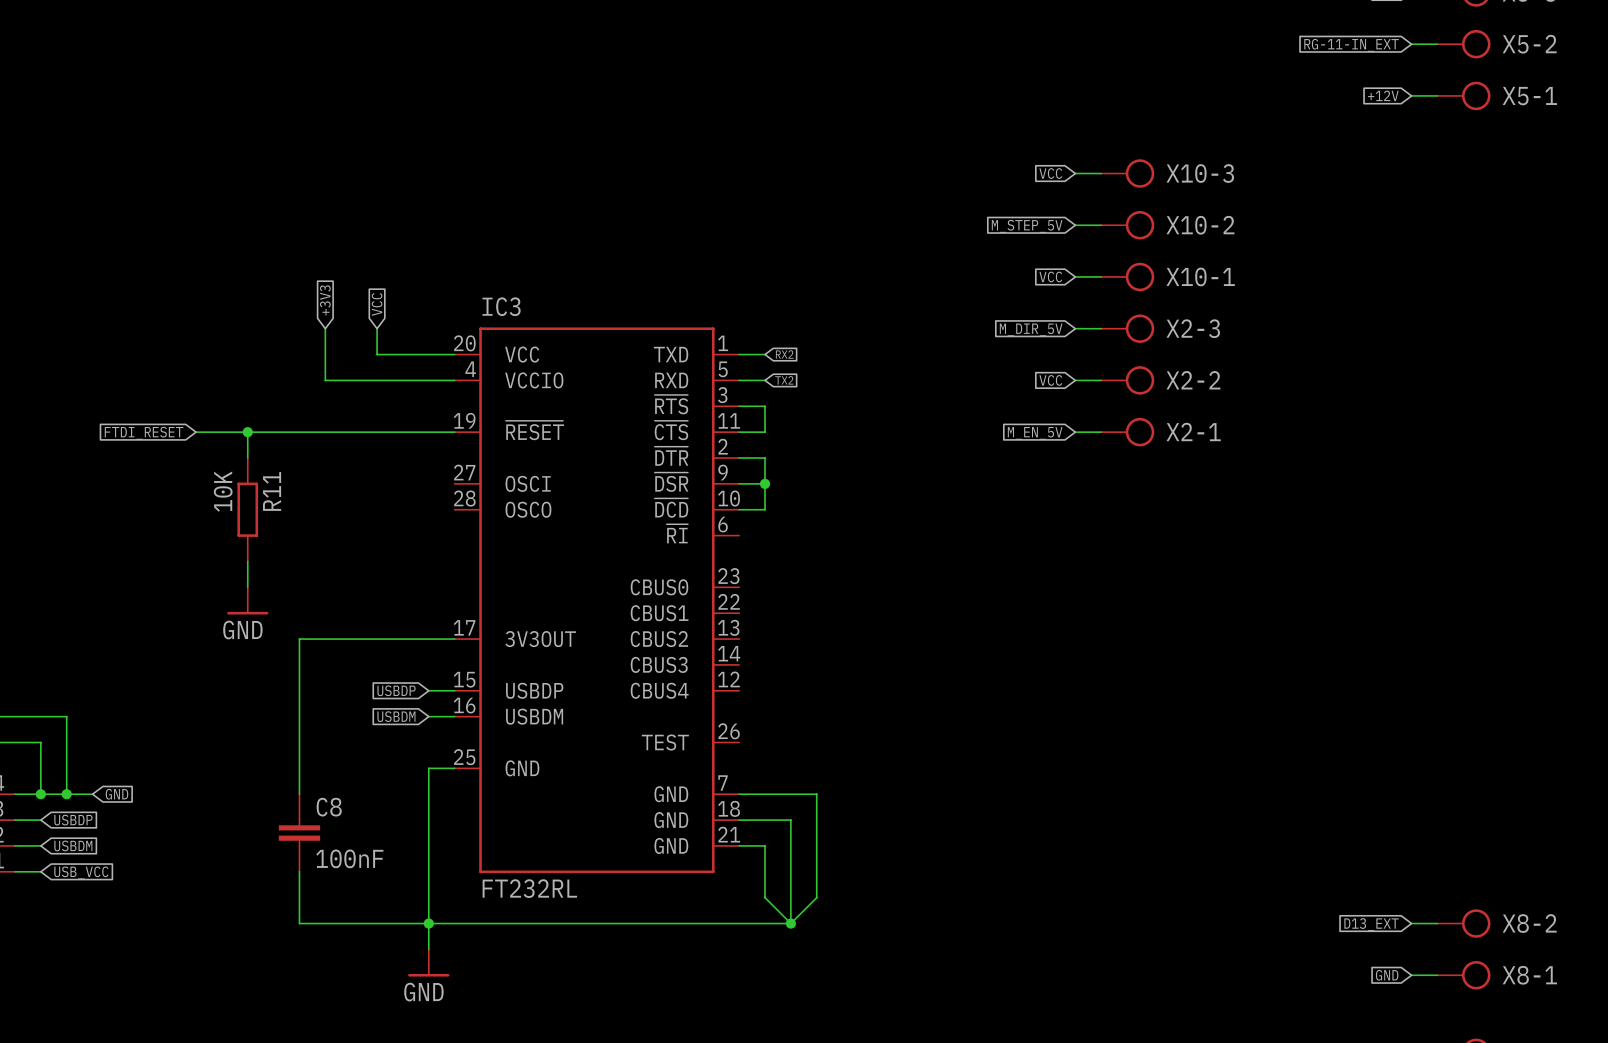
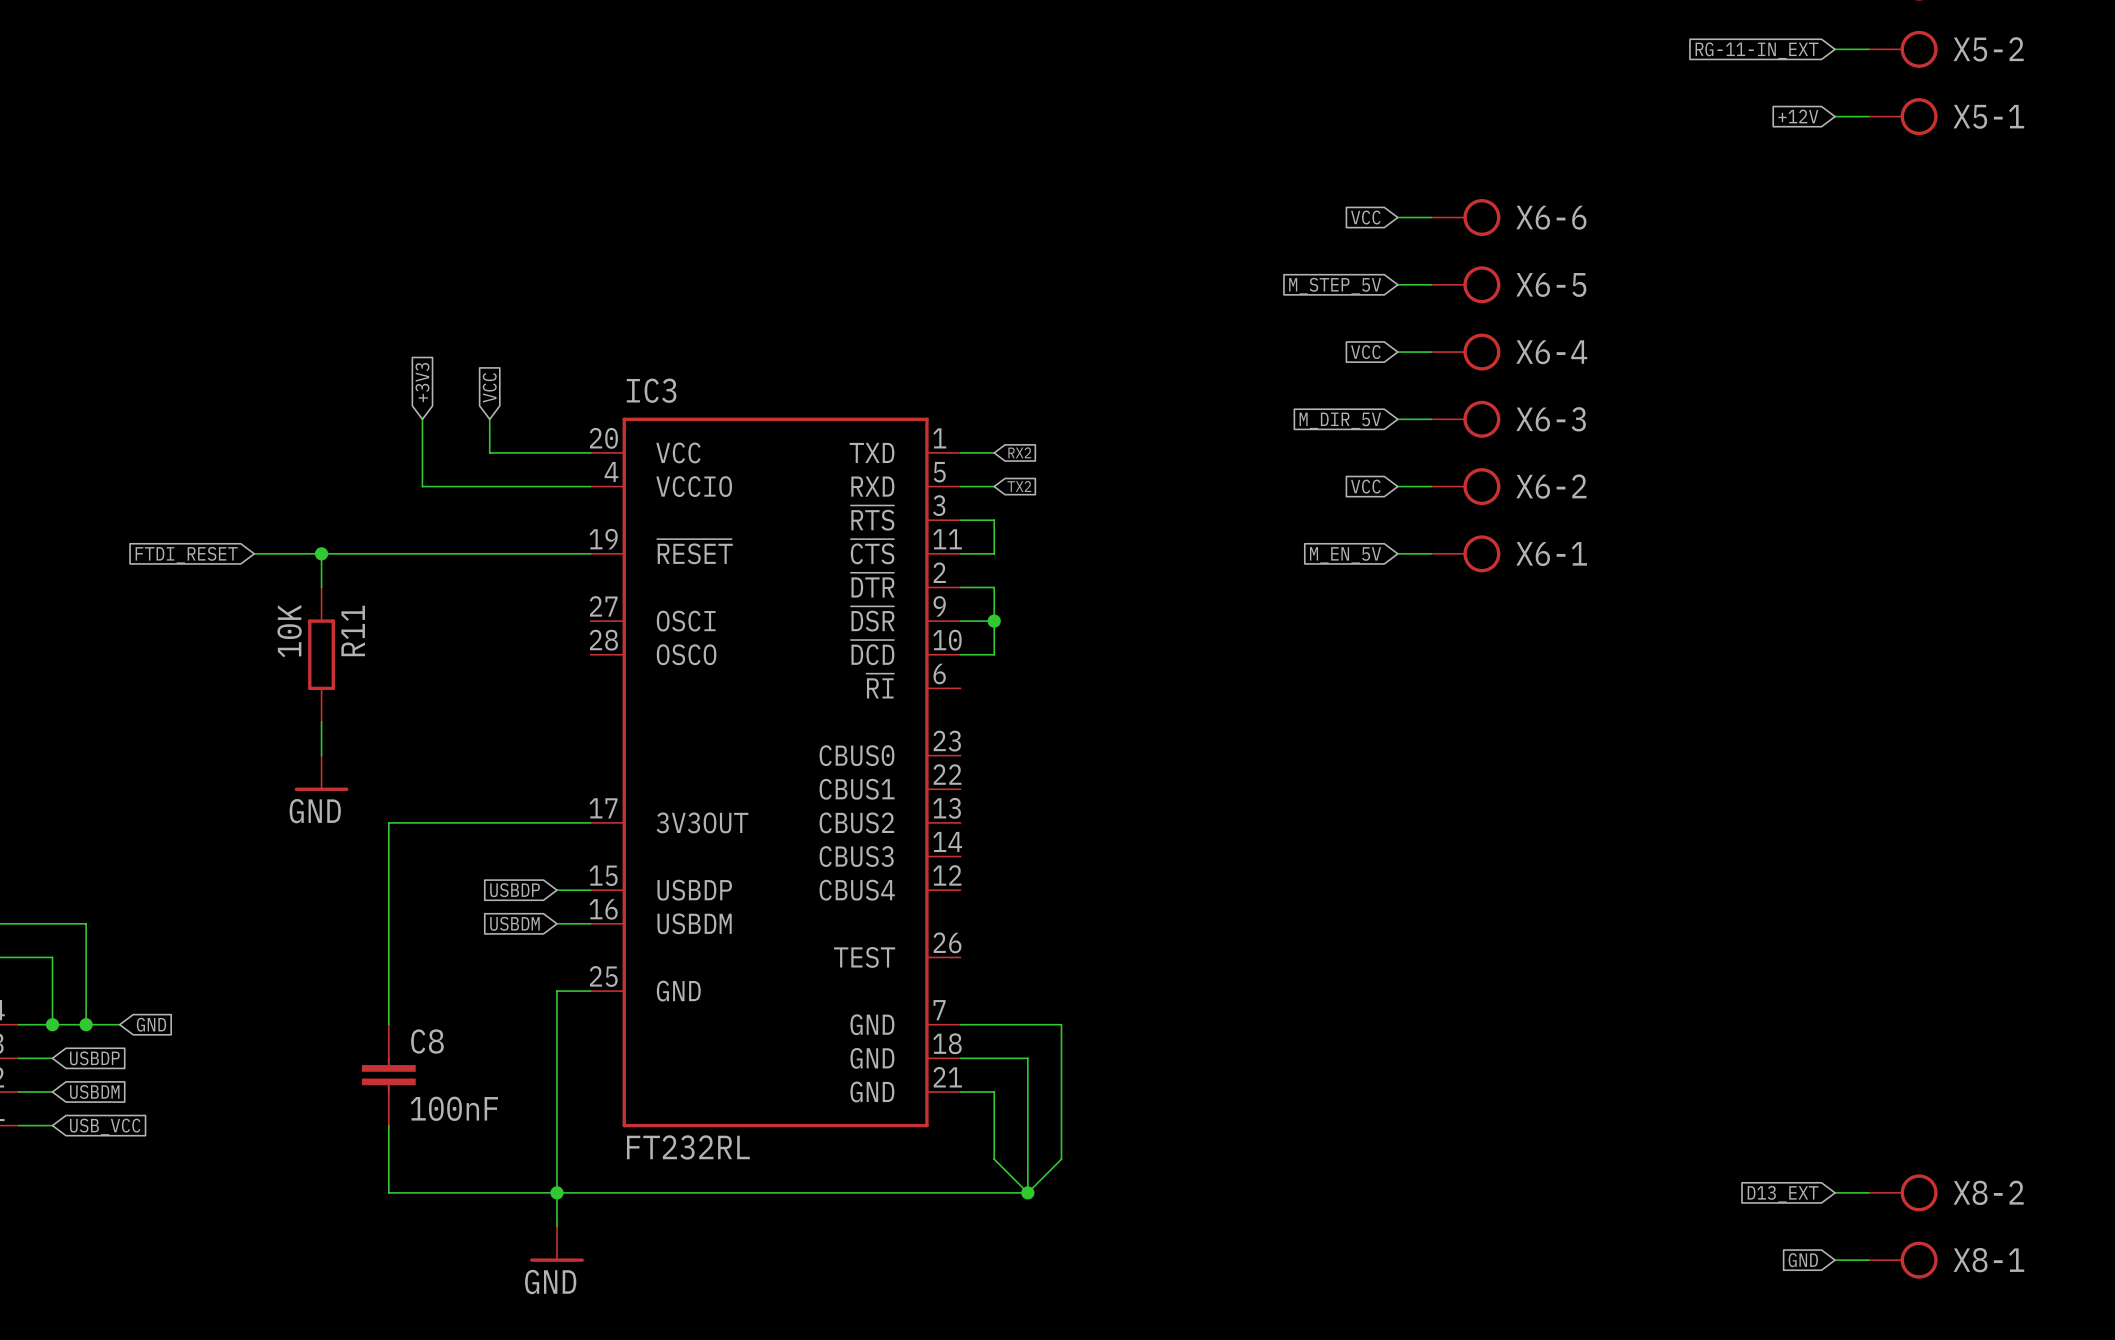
X10-3 name: X10-3 (1200, 173) -> X6-6 (1551, 217)
X10-2 name: X10-2 (1200, 225) -> X6-5 (1551, 284)
X10-1 name: X10-1 (1200, 276) -> X6-4 (1551, 352)
X2-3 name: X2-3 (1193, 328) -> X6-3 (1551, 419)
X2-2 name: X2-2 (1193, 380) -> X6-2 (1551, 486)
X2-1 name: X2-1 (1193, 431) -> X6-1 (1551, 554)

